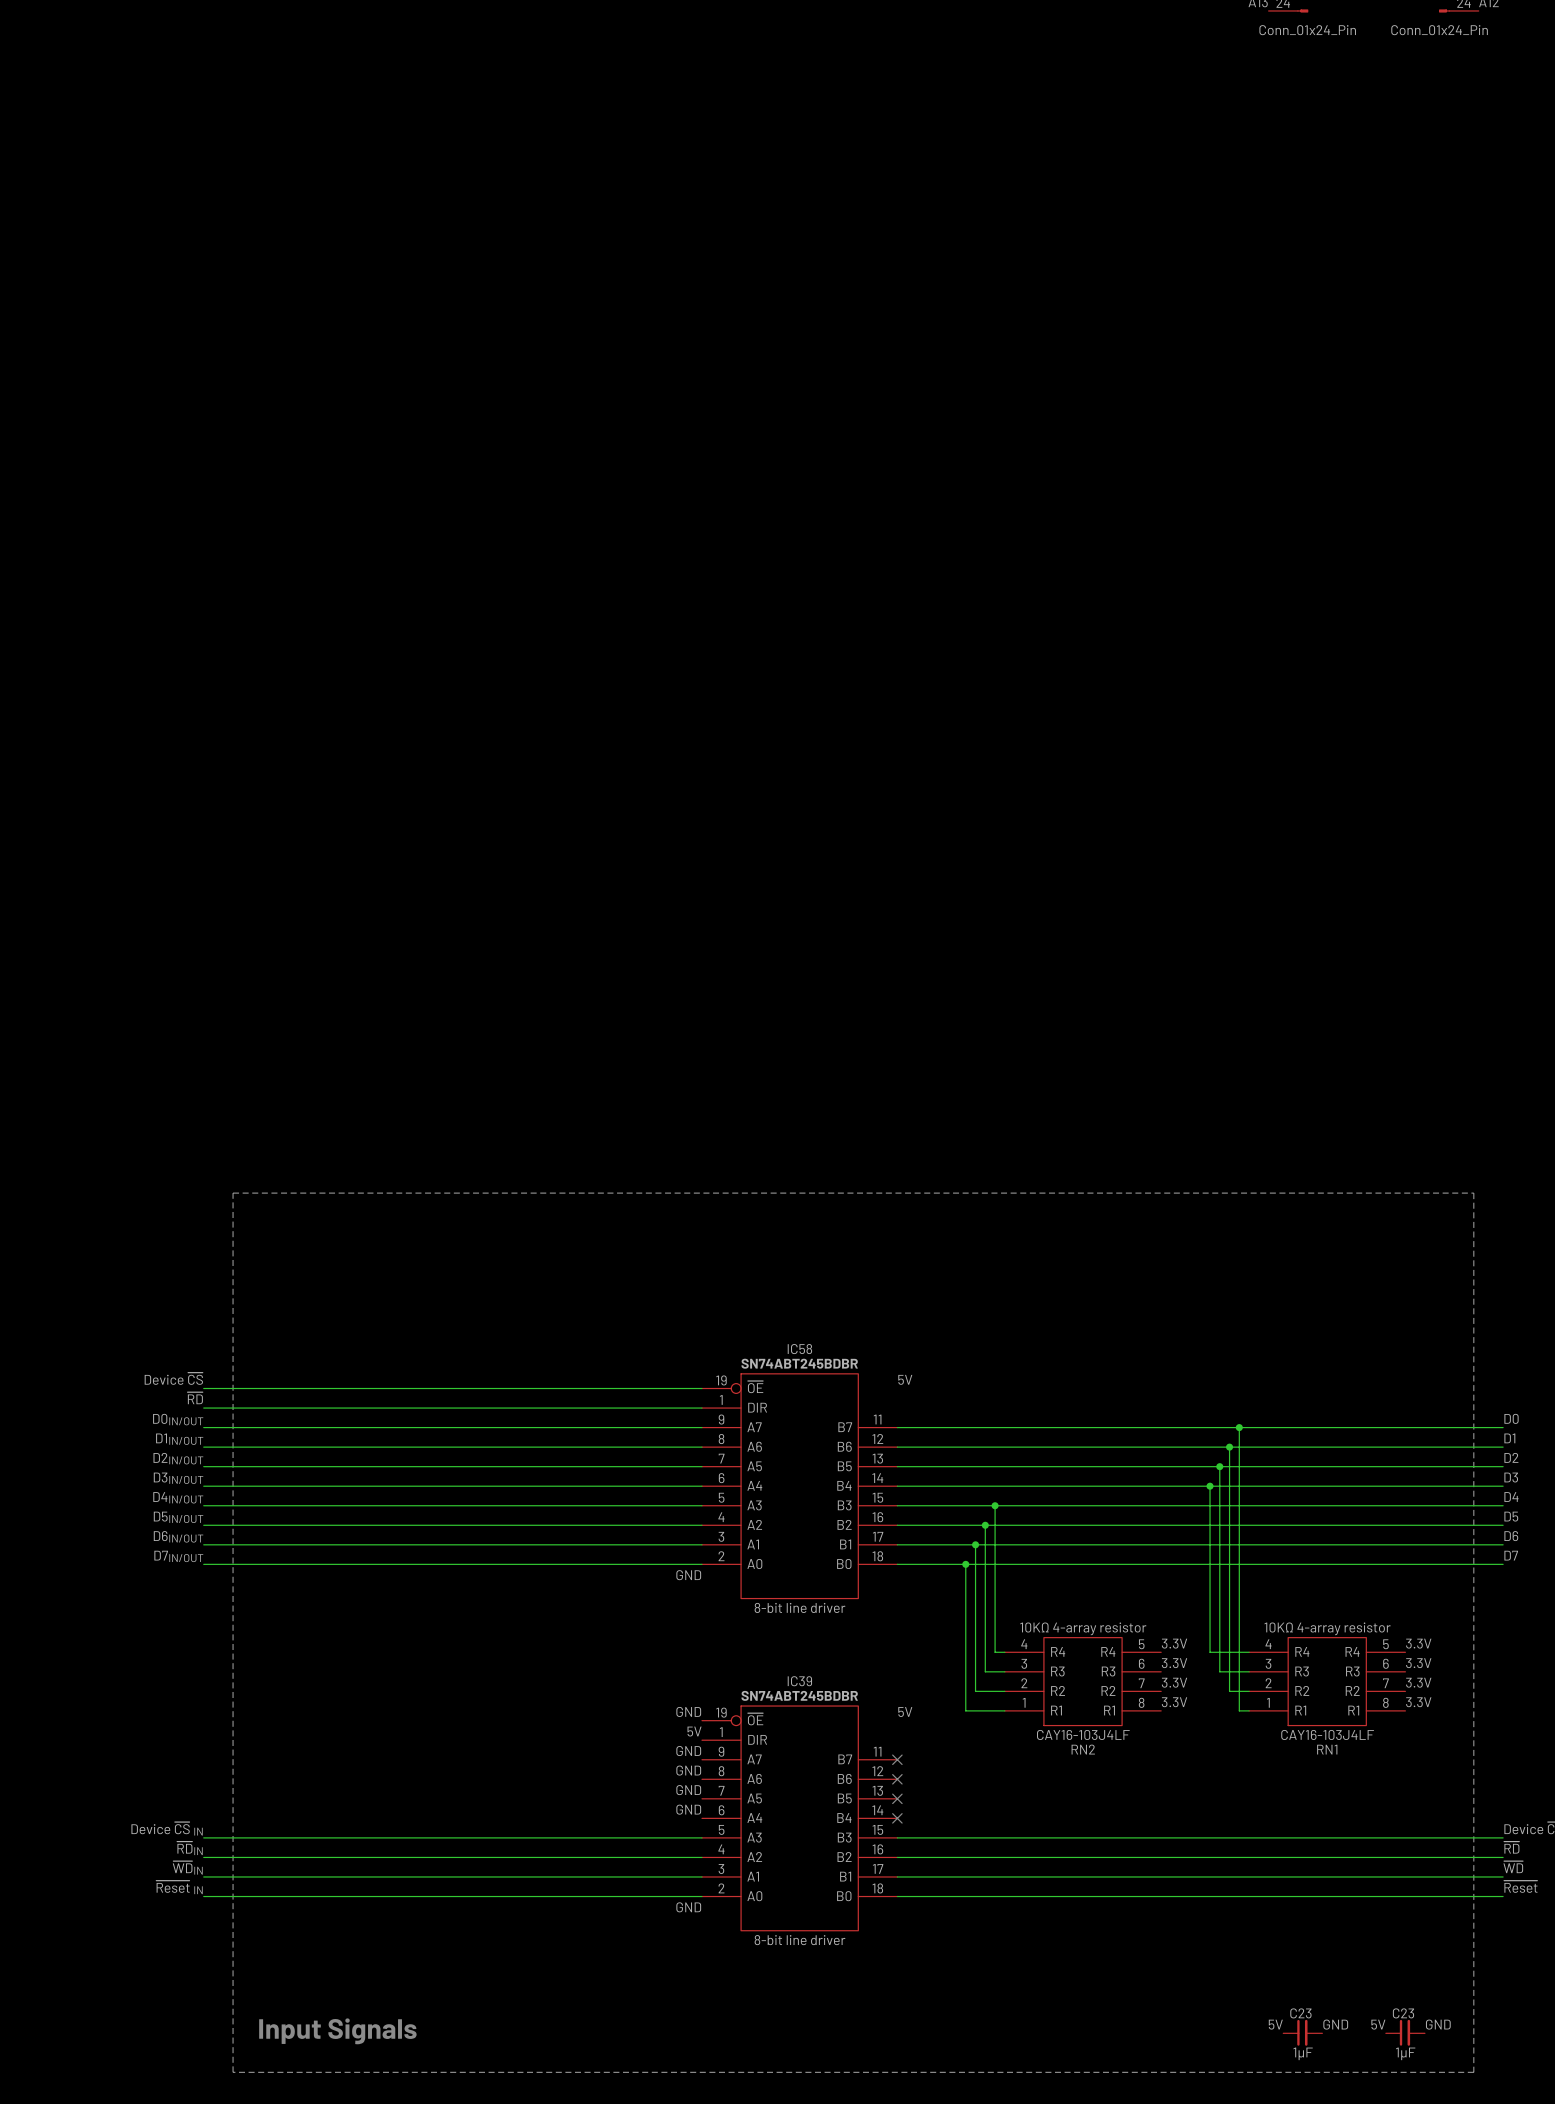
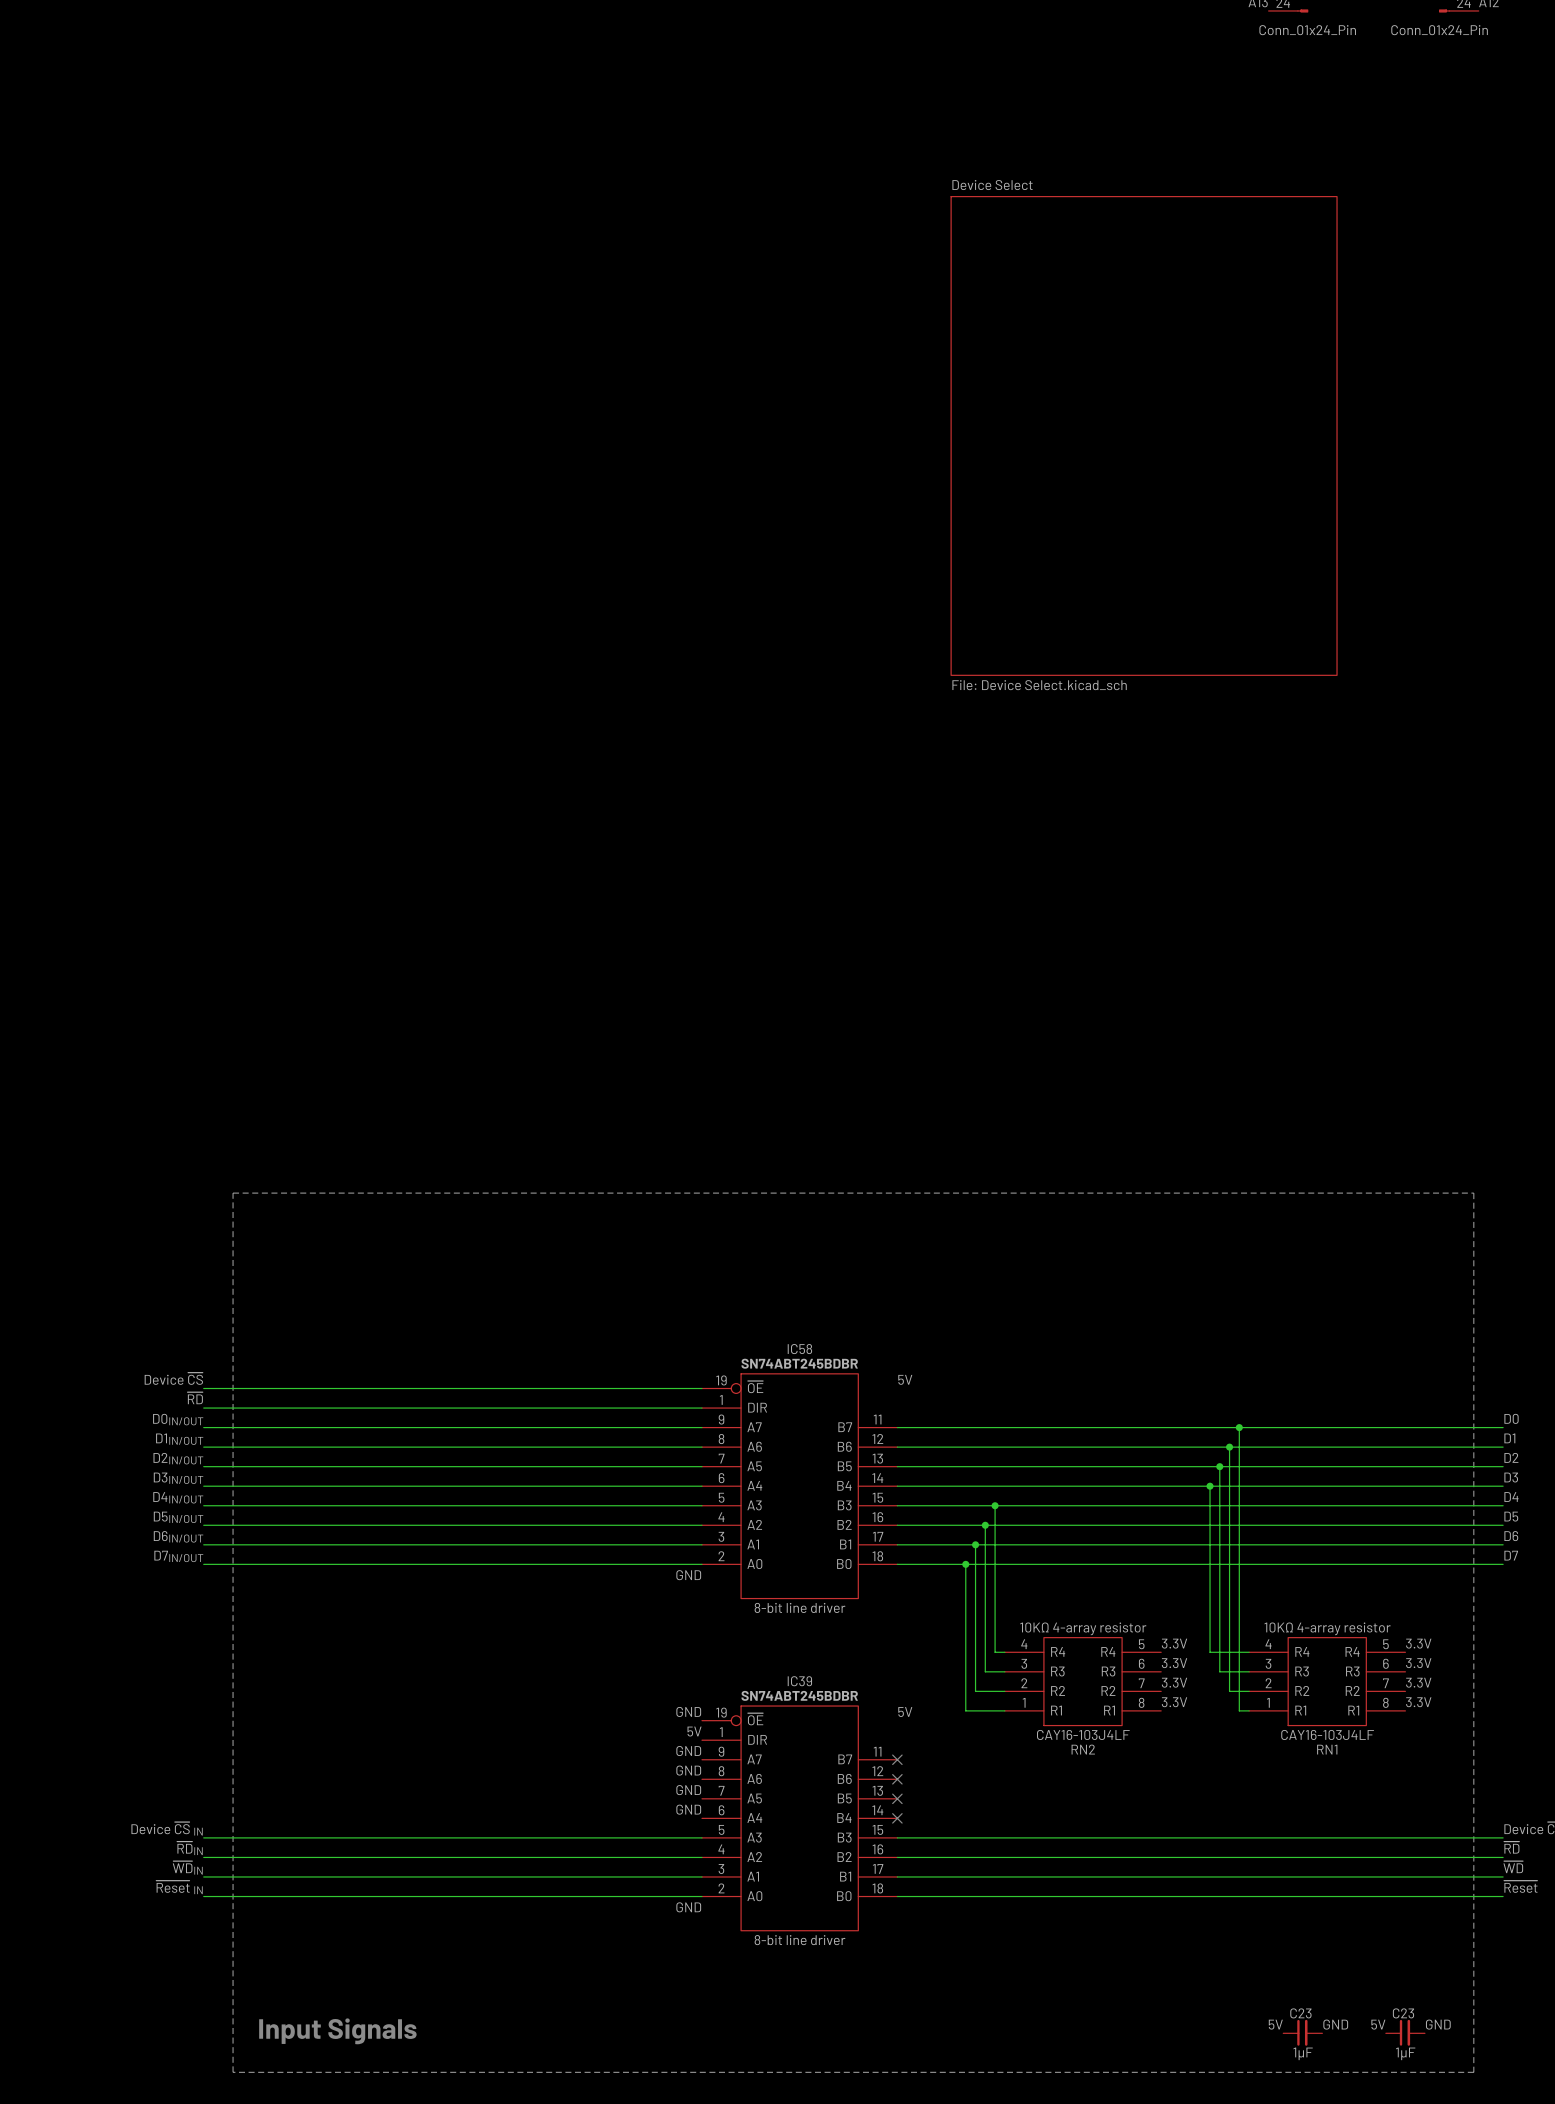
sheet Device Select: none -> File: Device Select.kicad_sch (1144, 435)

